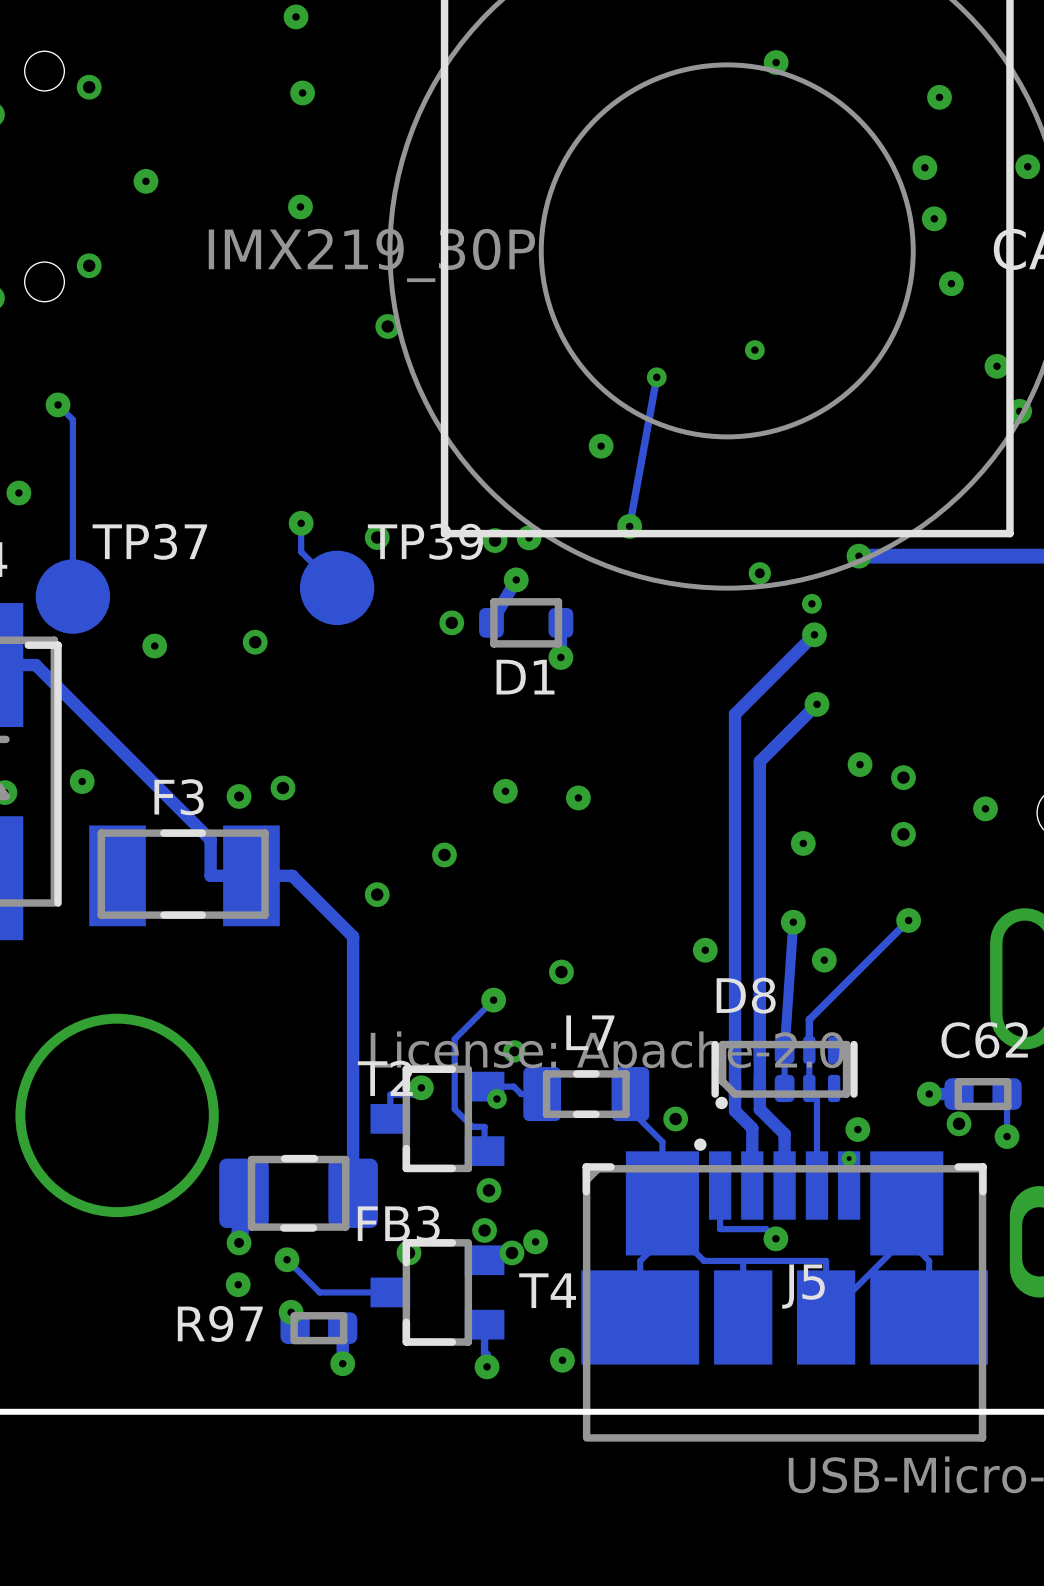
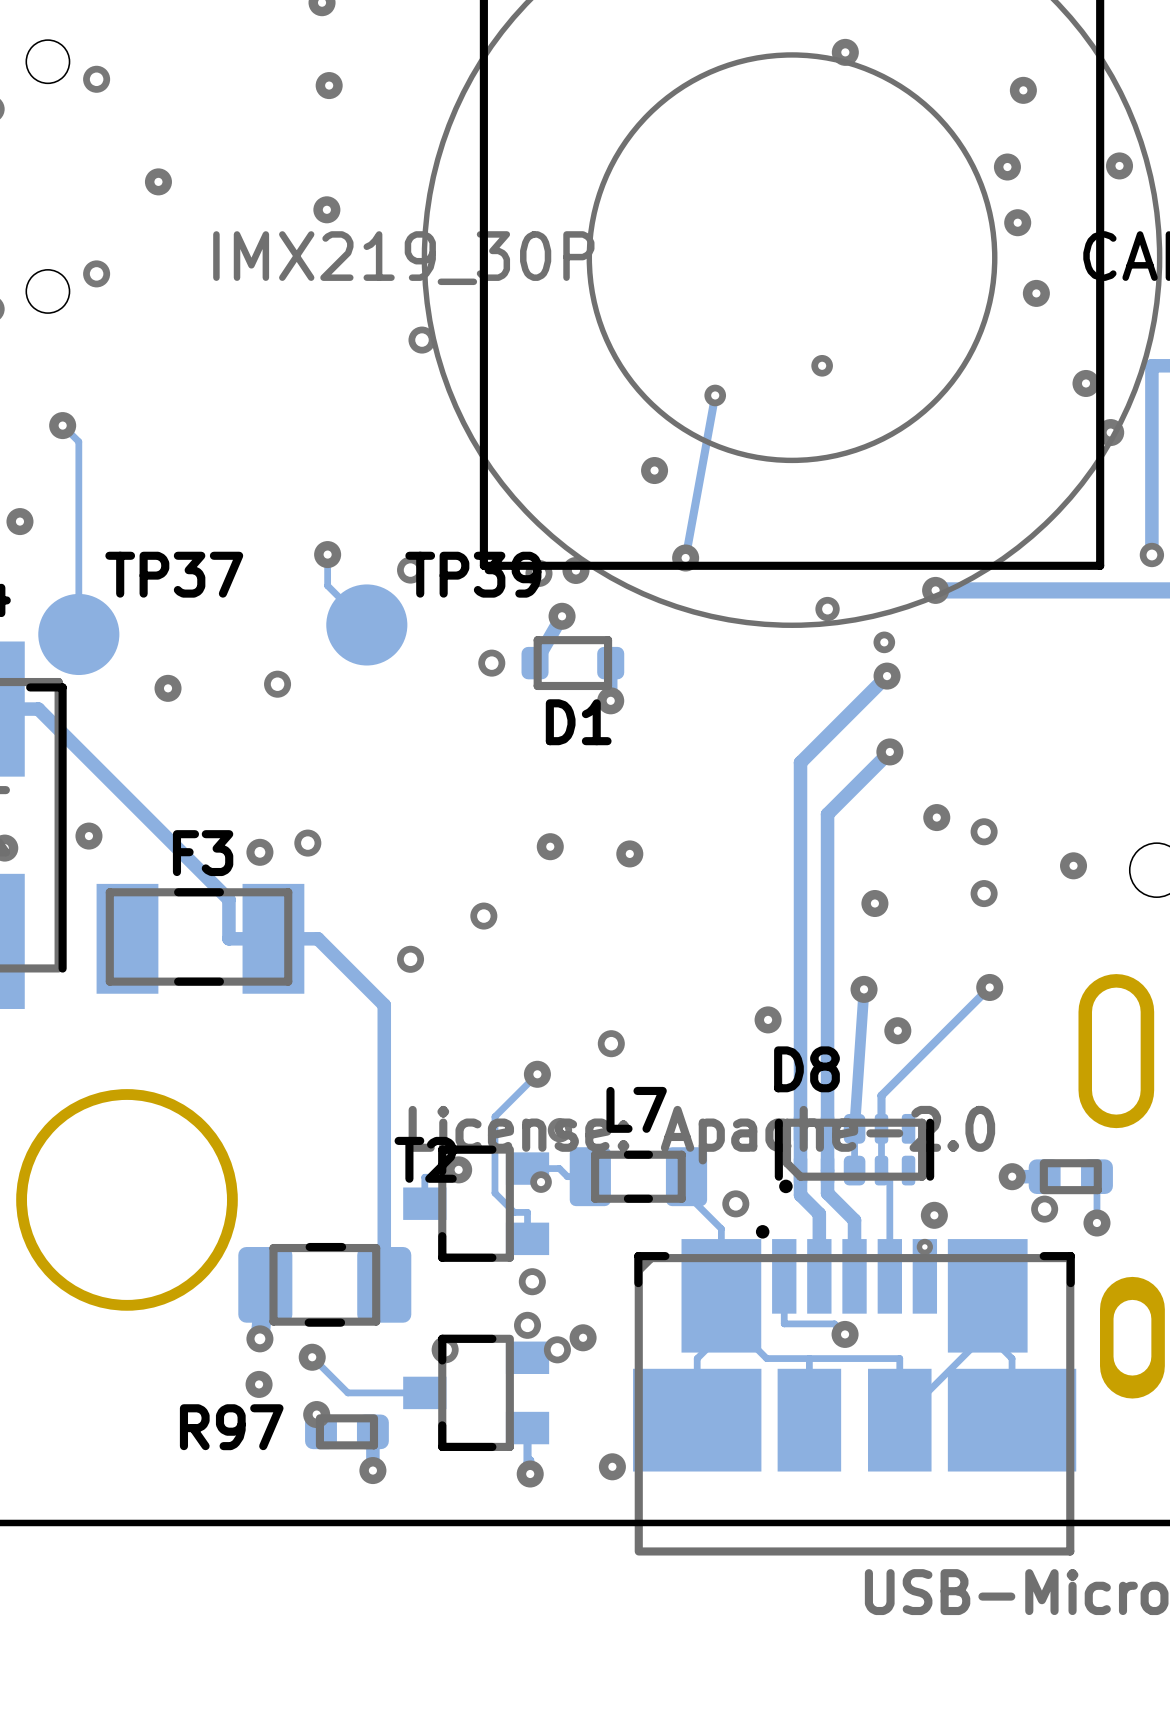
C62 name: C62 (984, 1040) -> none
FB3 name: FB3 (398, 1223) -> none
J5 name: J5 (803, 1286) -> none
T4 name: T4 (547, 1290) -> none

